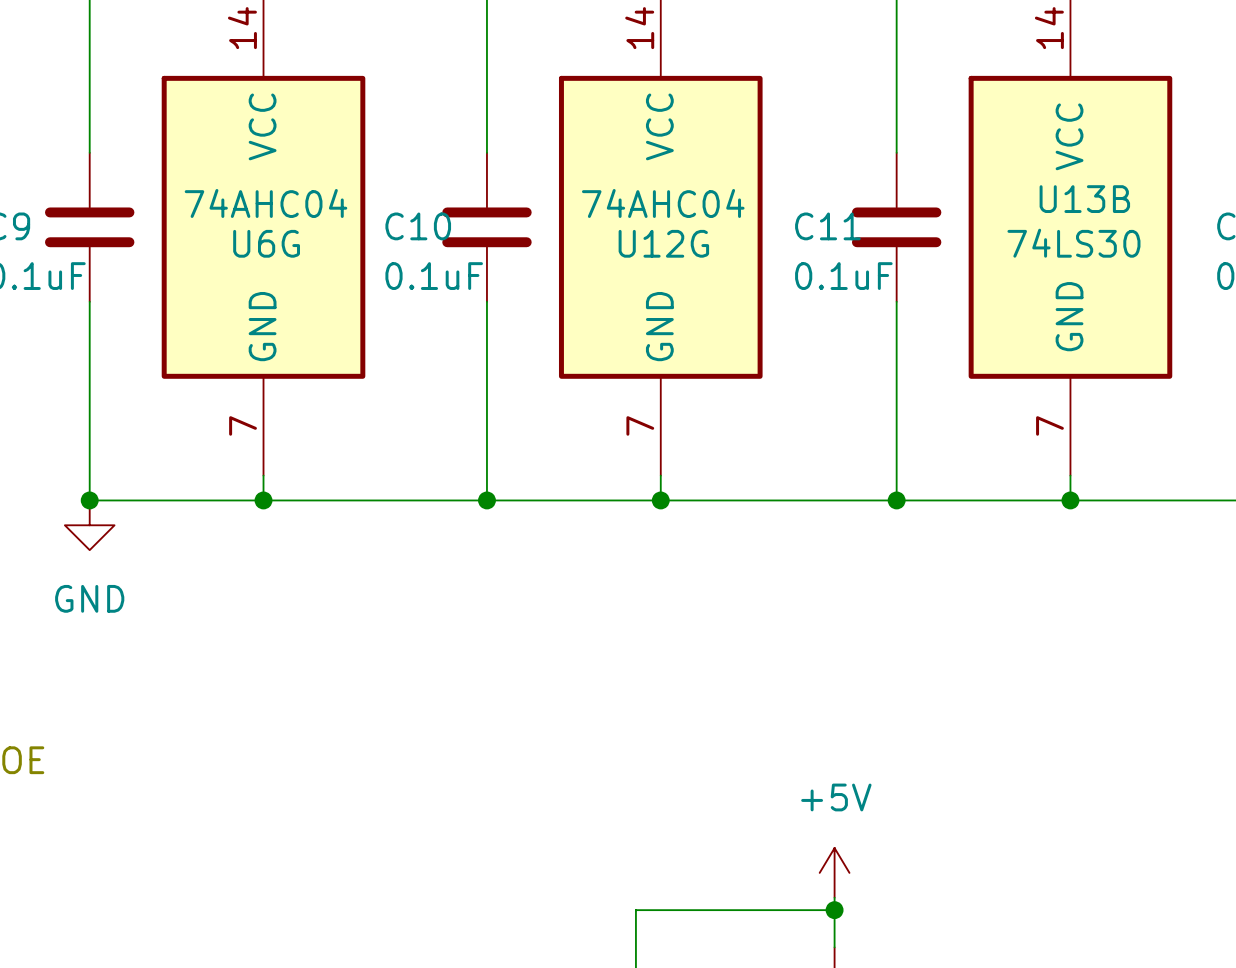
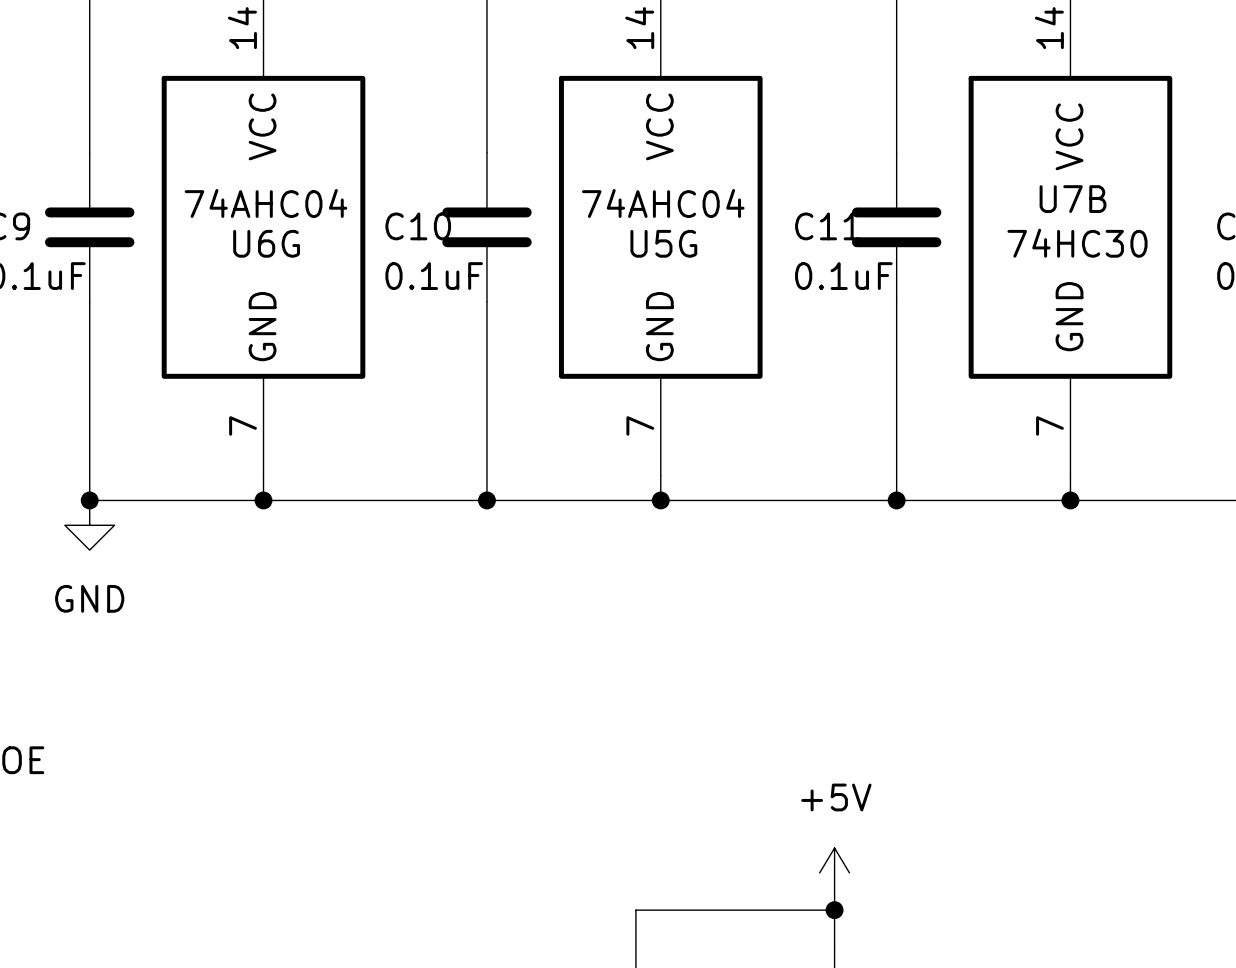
U13B name: U13B (1084, 199) -> U7B (1073, 199)
U12G name: U12G (663, 243) -> U5G (663, 243)
U13B value: 74LS30 (1073, 243) -> 74HC30 (1077, 243)

